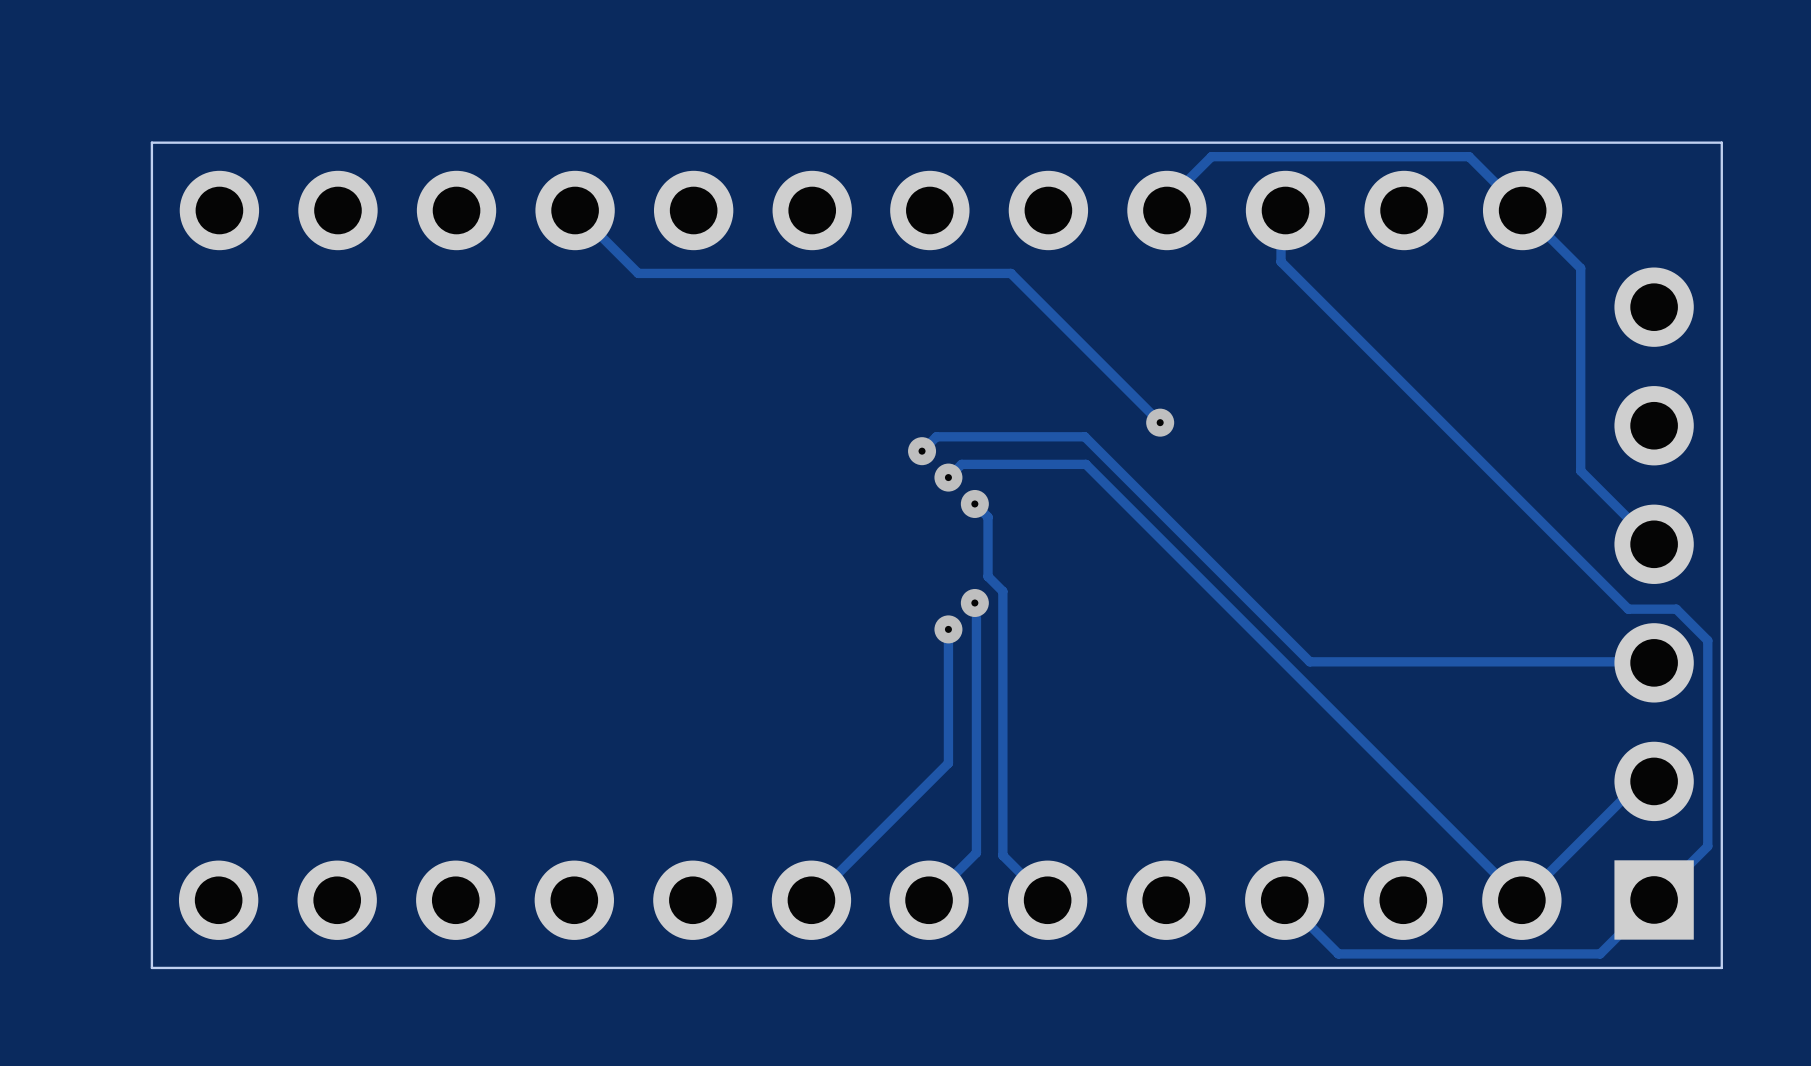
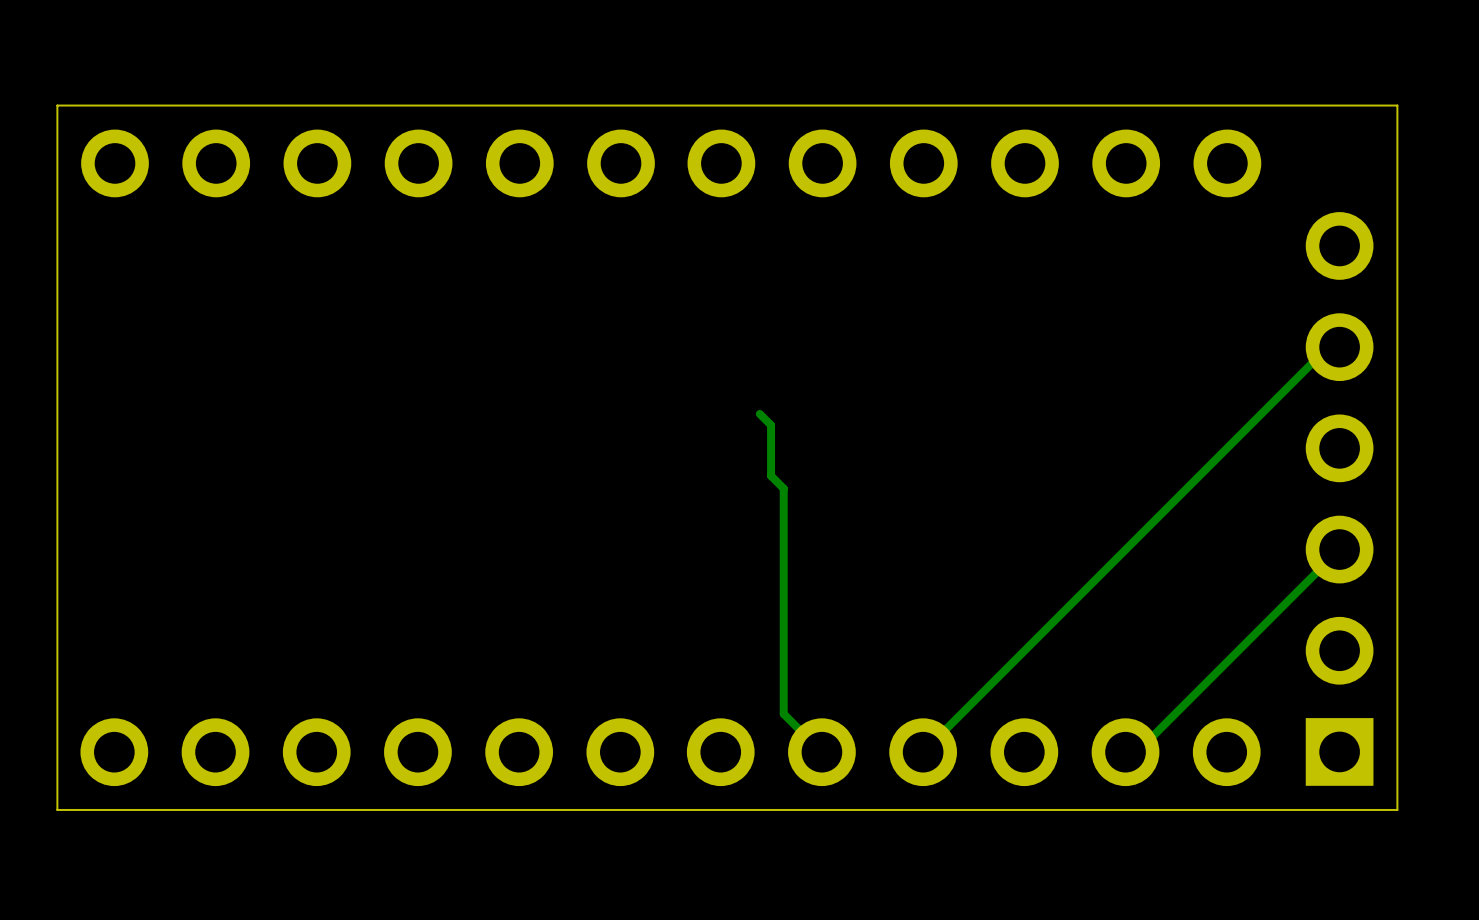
track: (570, 205) (638, 273) (1010, 273) (1160, 422) -> none
track: (1162, 205) (1211, 156) (1469, 156) (1580, 268) (1580, 470) (1654, 544) -> none
track: (1281, 205) (1281, 261) (1628, 609) (1676, 609) (1707, 640) (1707, 846) (1600, 953) (1338, 953) (1284, 900) -> none
via: (1160, 422) -> none
track: none -> (1339, 347) (1328, 347) (923, 752)
track: (922, 451) (936, 436) (1084, 436) (1309, 661) (1653, 661) -> (1125, 752) (1136, 752) (1339, 549)
via: (922, 451) -> none
track: (948, 477) (961, 464) (1085, 464) (1521, 900) (1640, 781) -> none
via: (948, 477) -> none
via: (974, 503) -> none
via: (974, 602) -> none
track: (976, 617) (976, 852) (929, 900) -> none
track: (948, 629) (948, 763) (811, 900) -> none
via: (948, 629) -> none

